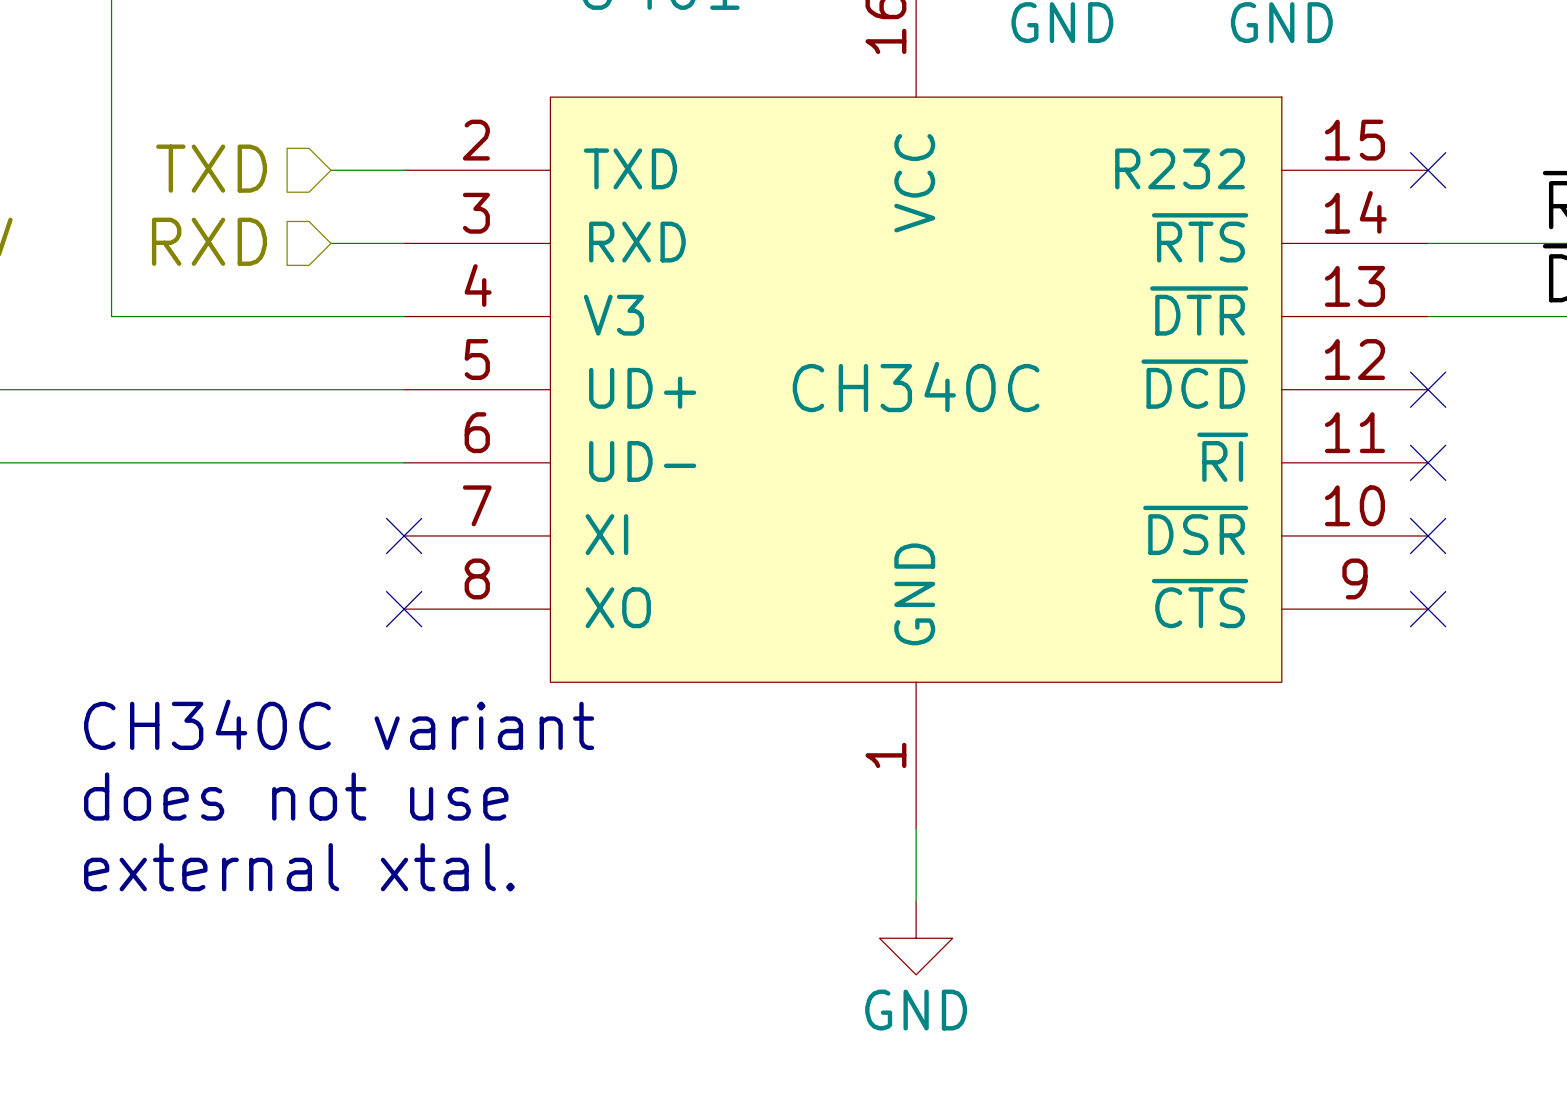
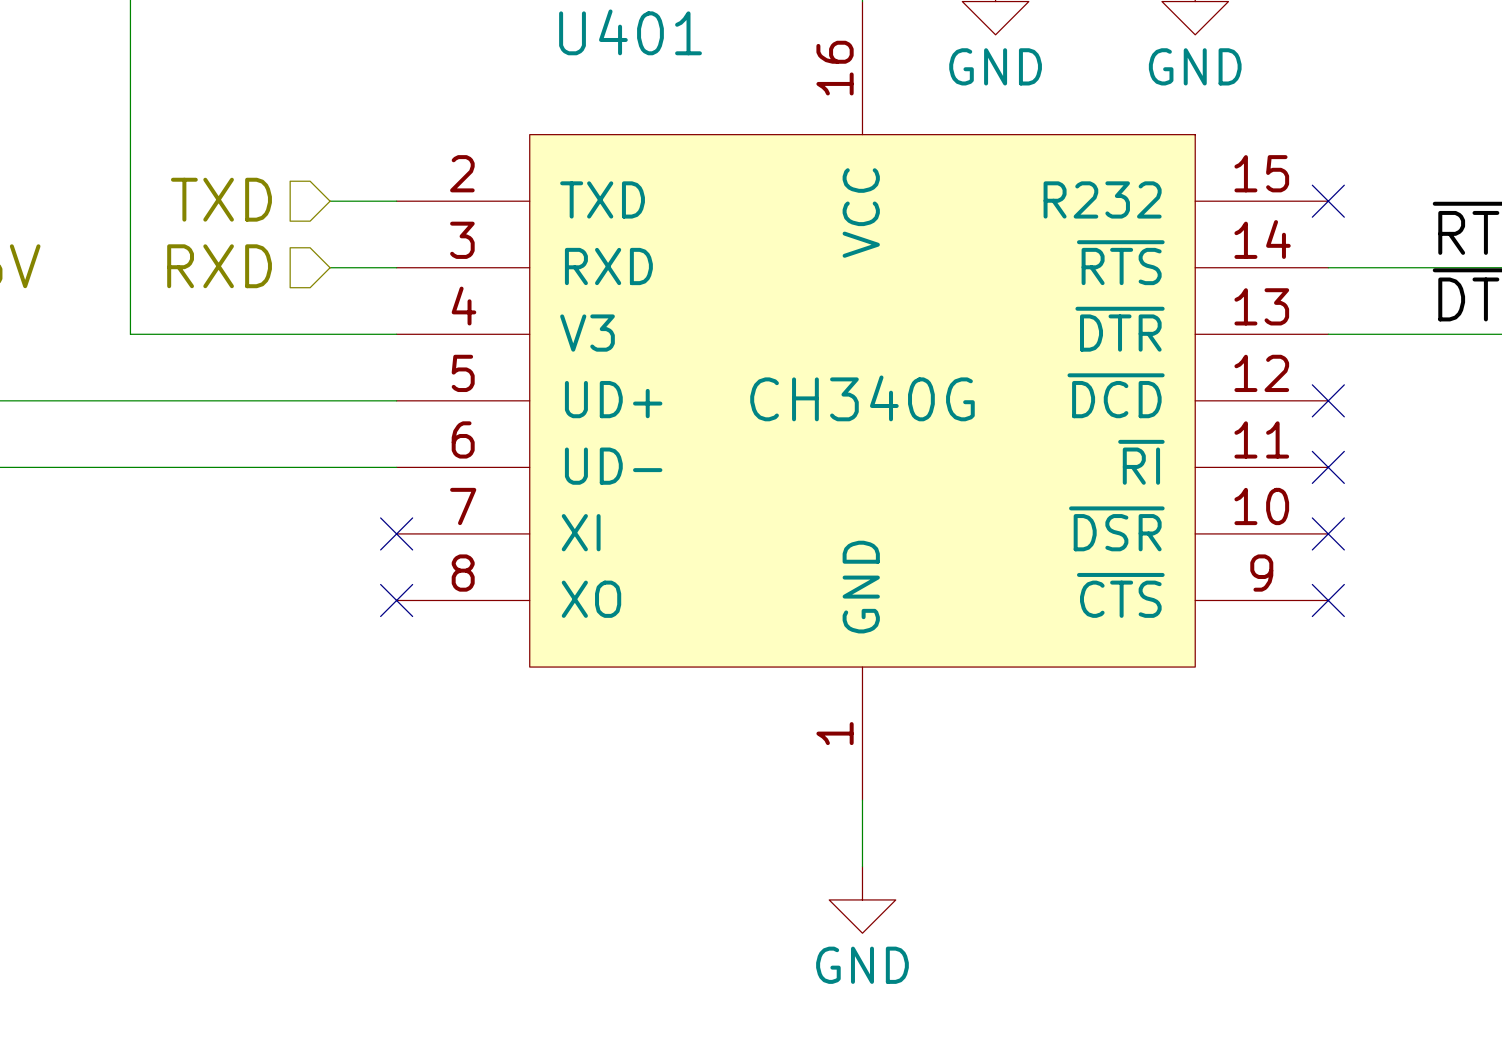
U401 value: CH340C (916, 387) -> CH340G (862, 398)
text: CH340C variant (339, 724) -> none
text: does not use (296, 796) -> none
text: external xtal. (299, 867) -> none

